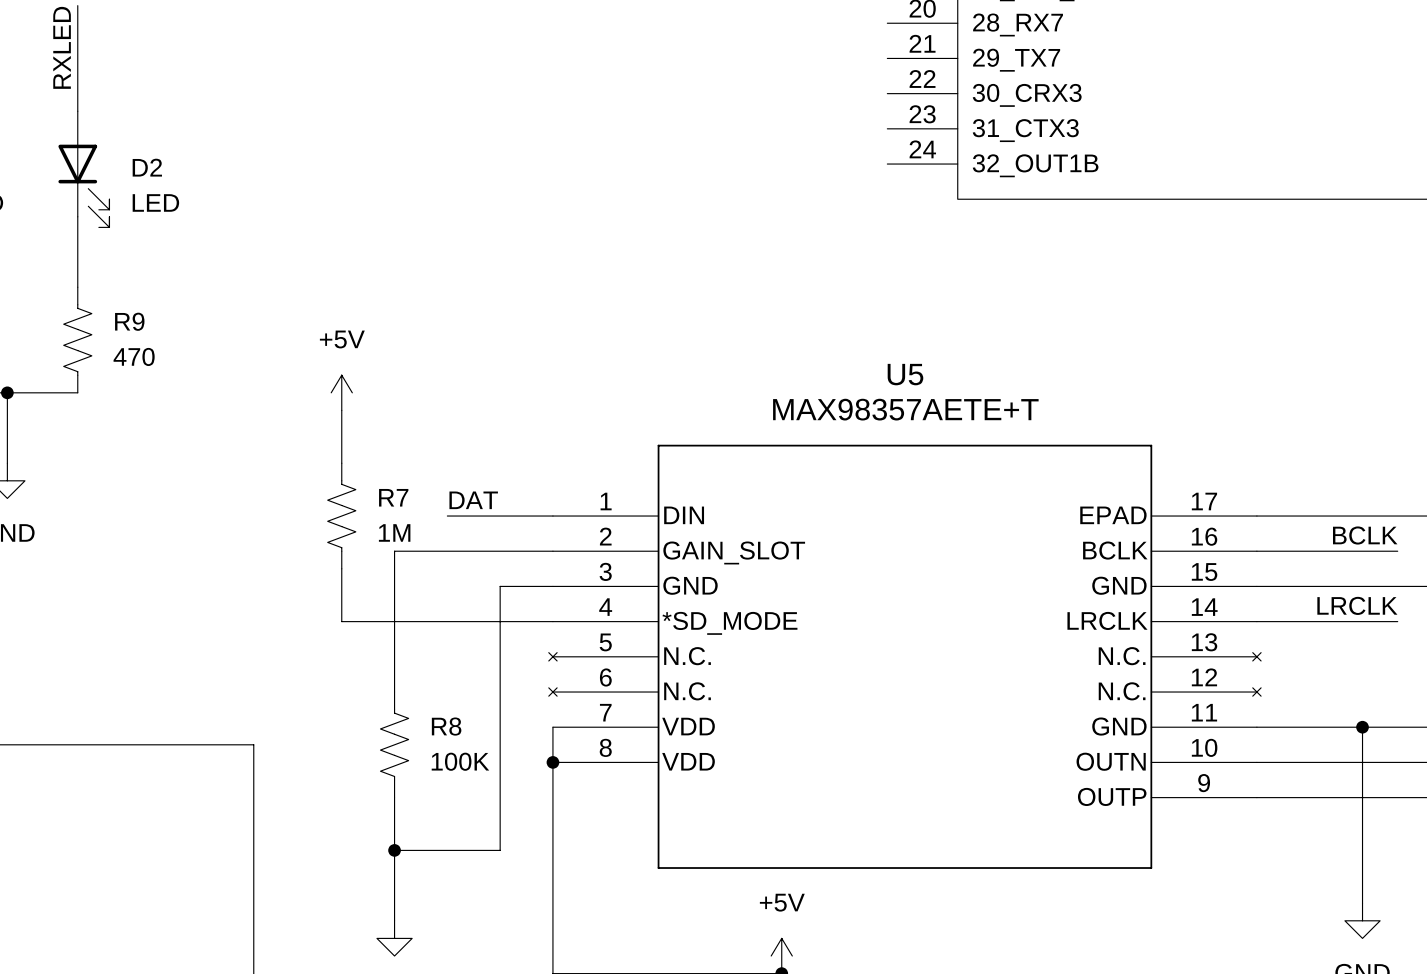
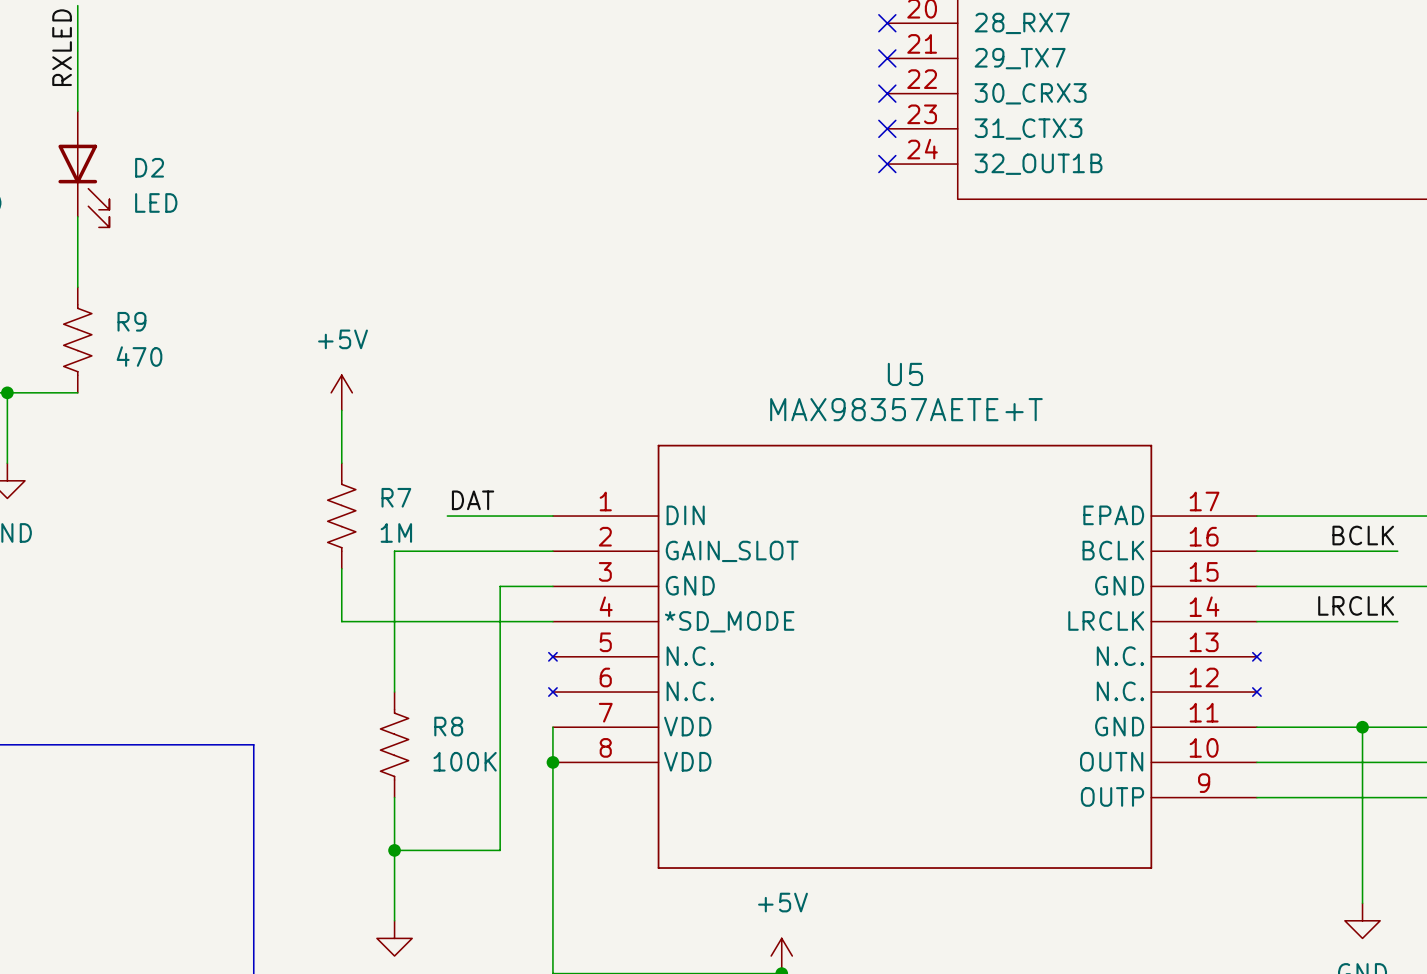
no-connect mark: none -> (887, 23)
no-connect mark: none -> (887, 58)
no-connect mark: none -> (887, 93)
no-connect mark: none -> (887, 128)
no-connect mark: none -> (887, 164)

